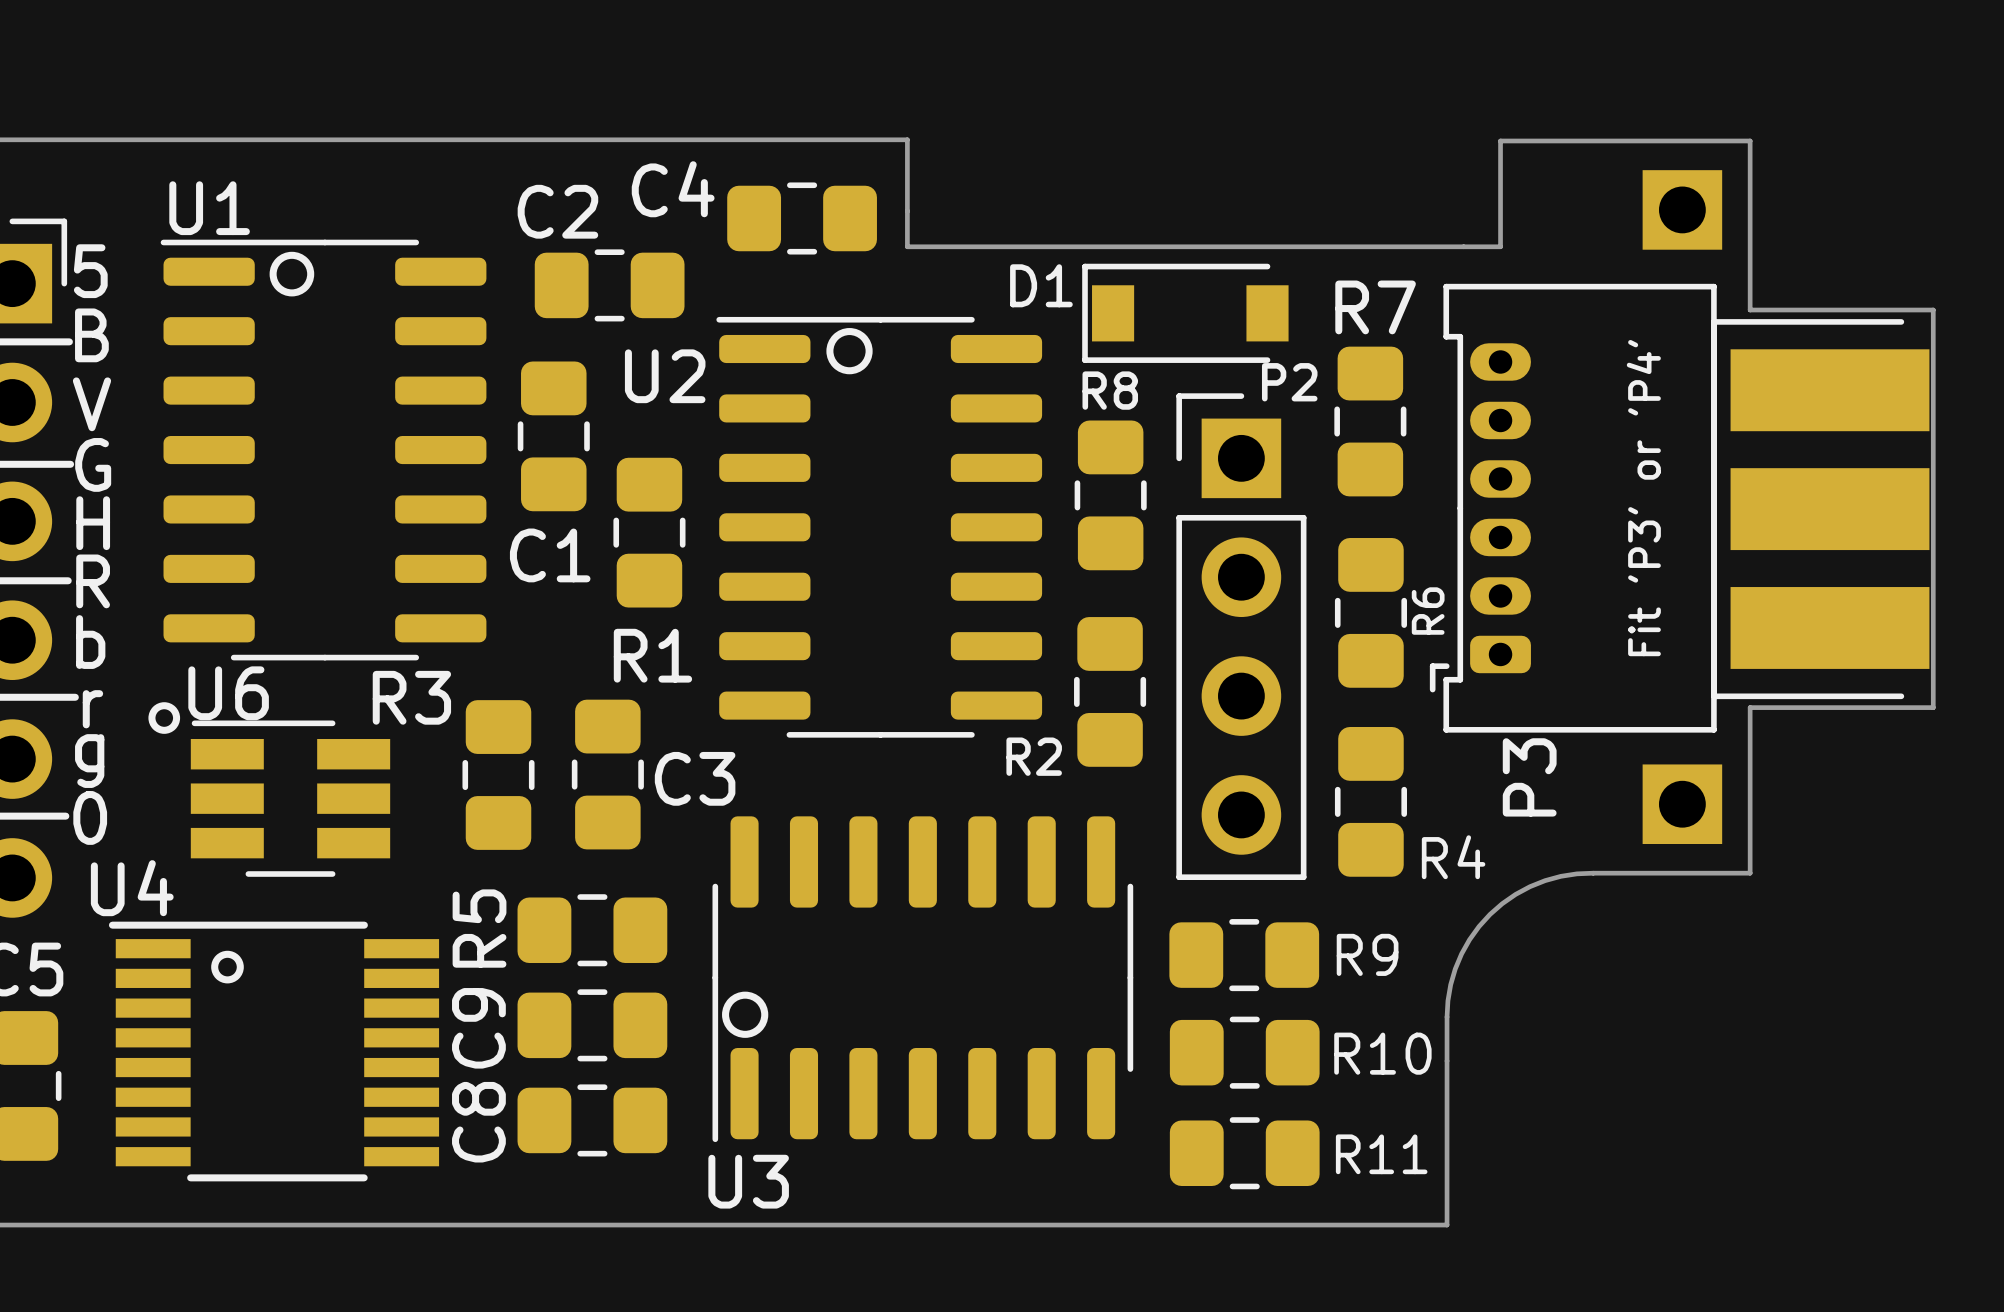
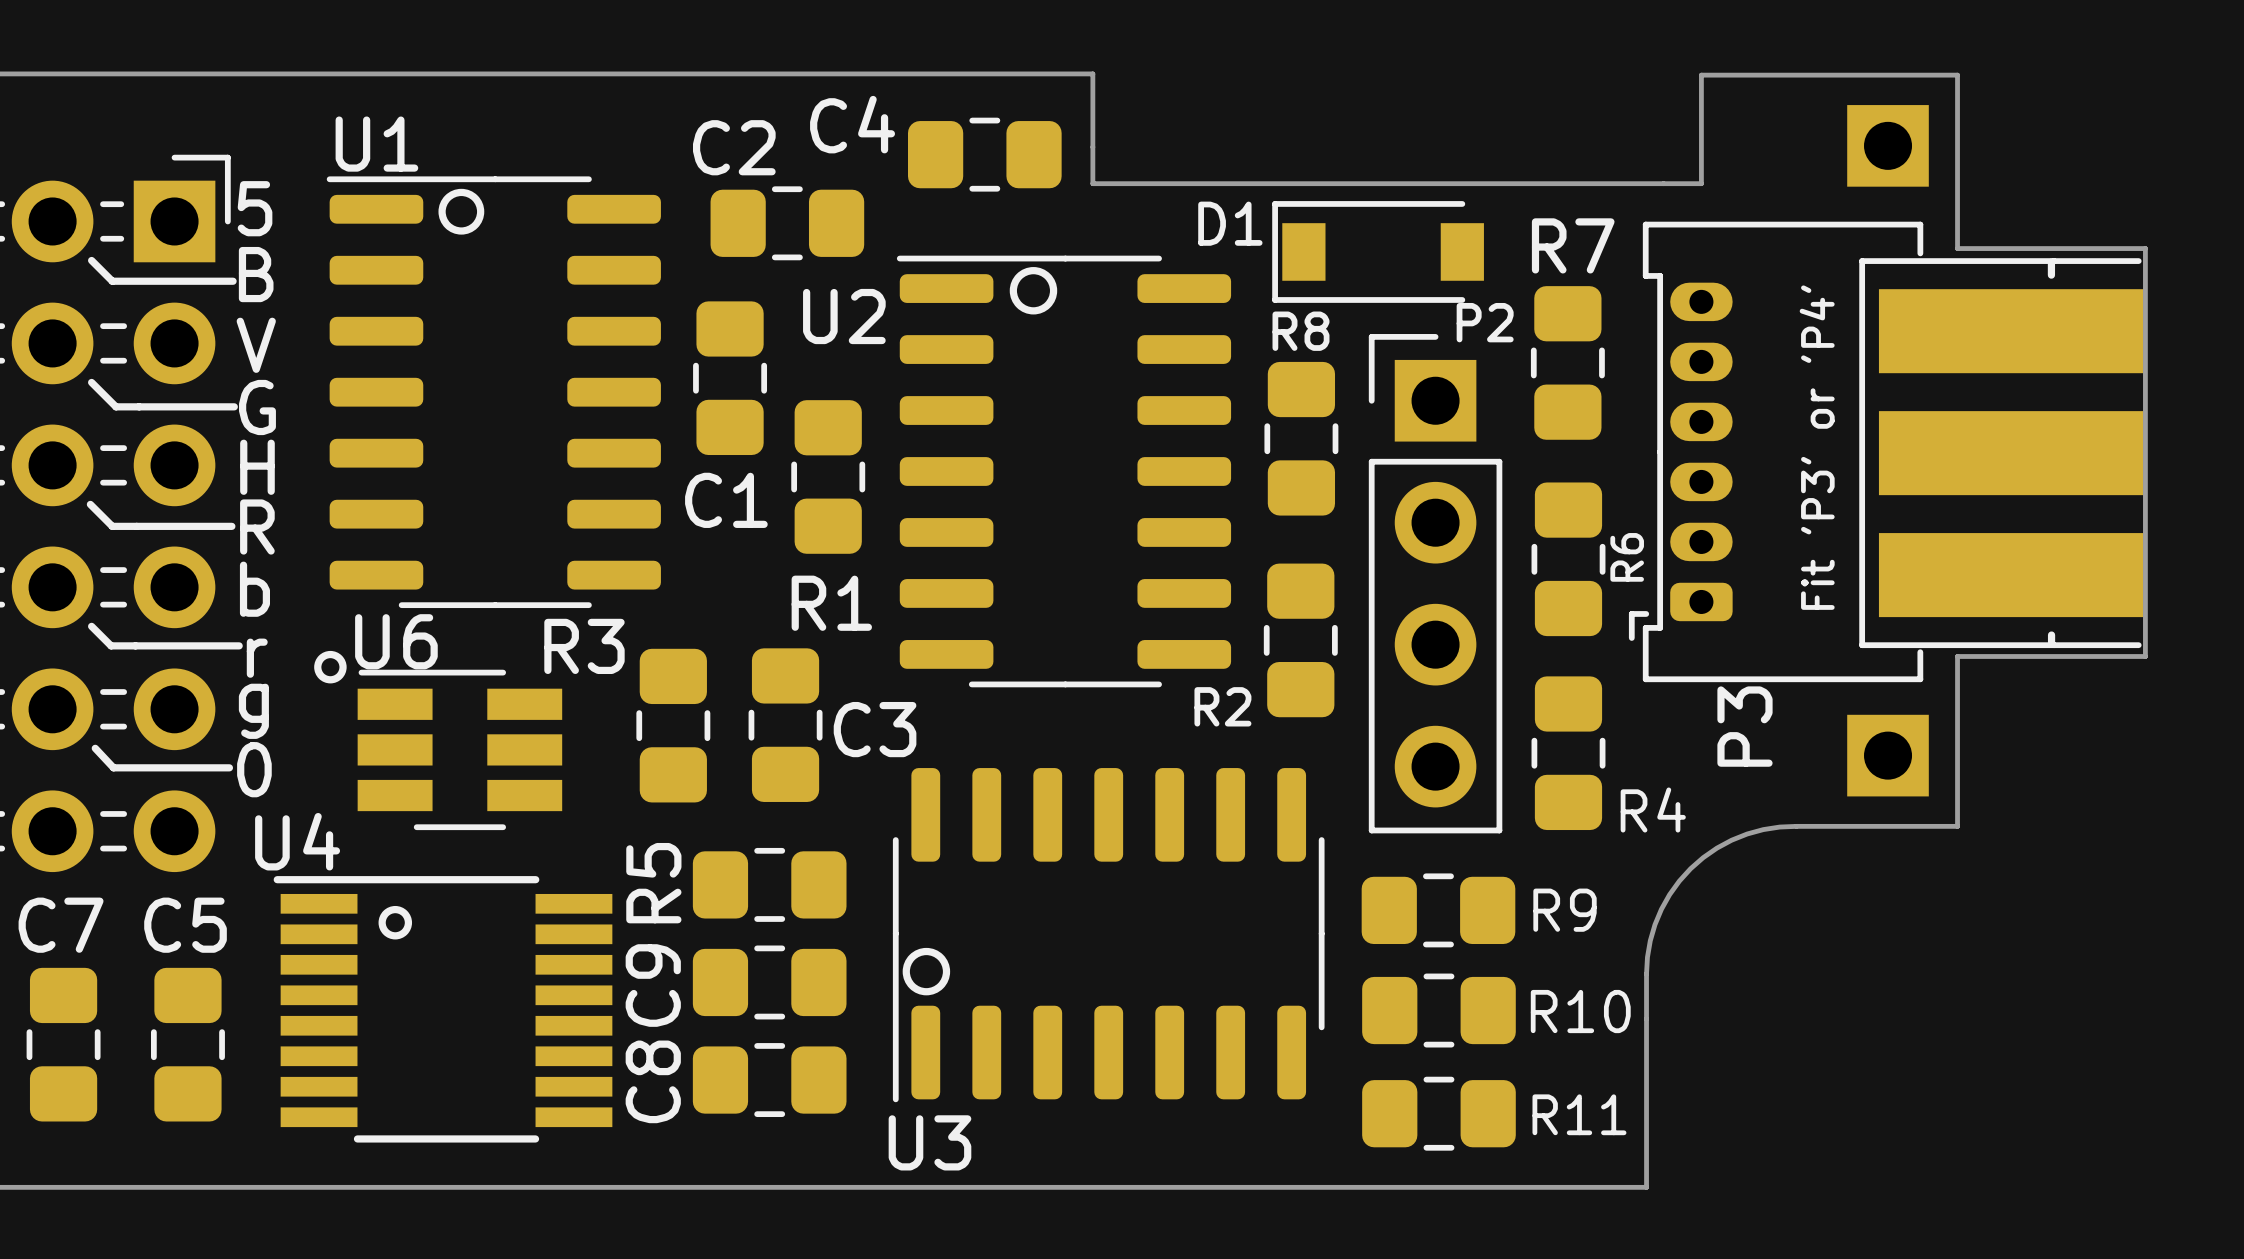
P3 footprint: [1429, 283, 1717, 733] -> [1628, 221, 1924, 683]
part footprint: [1711, 319, 1930, 700] -> [1859, 258, 2144, 649]
line: none -> (2051, 261) (2051, 275)
text position: Fit 'P3' or 'P4' (1643, 498) -> Fit 'P3' or 'P4' (1817, 447)
line: none -> (2051, 635) (2051, 644)

